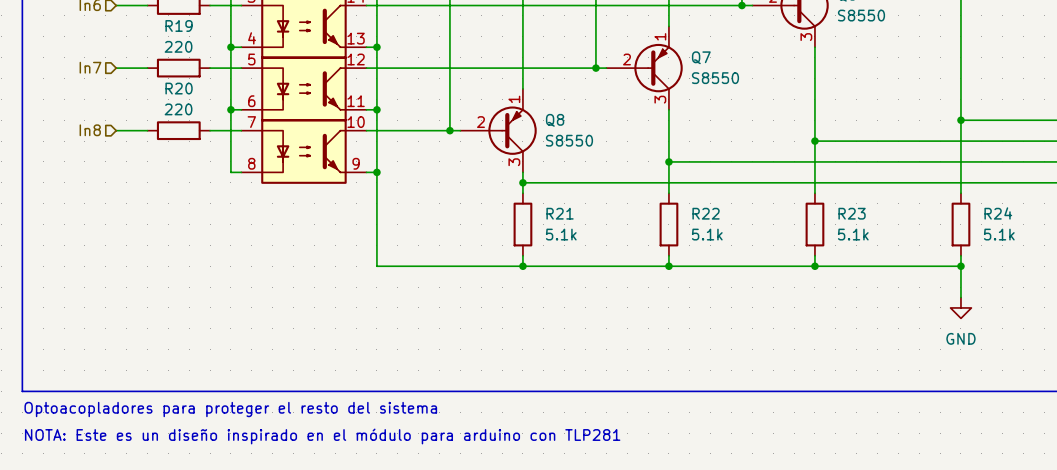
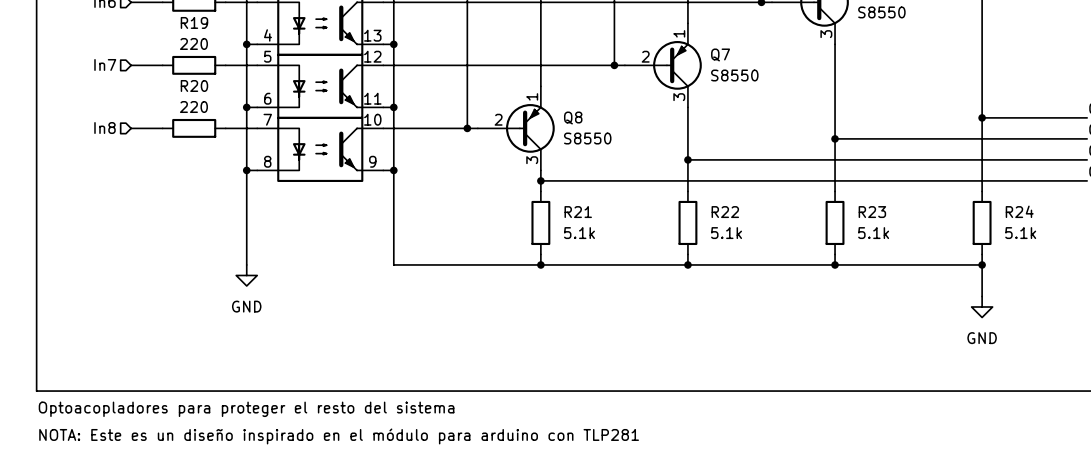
wire: none -> (246, 170) (246, 264)
junction: none -> (246, 170)
power symbol: none -> GND (246, 275)

